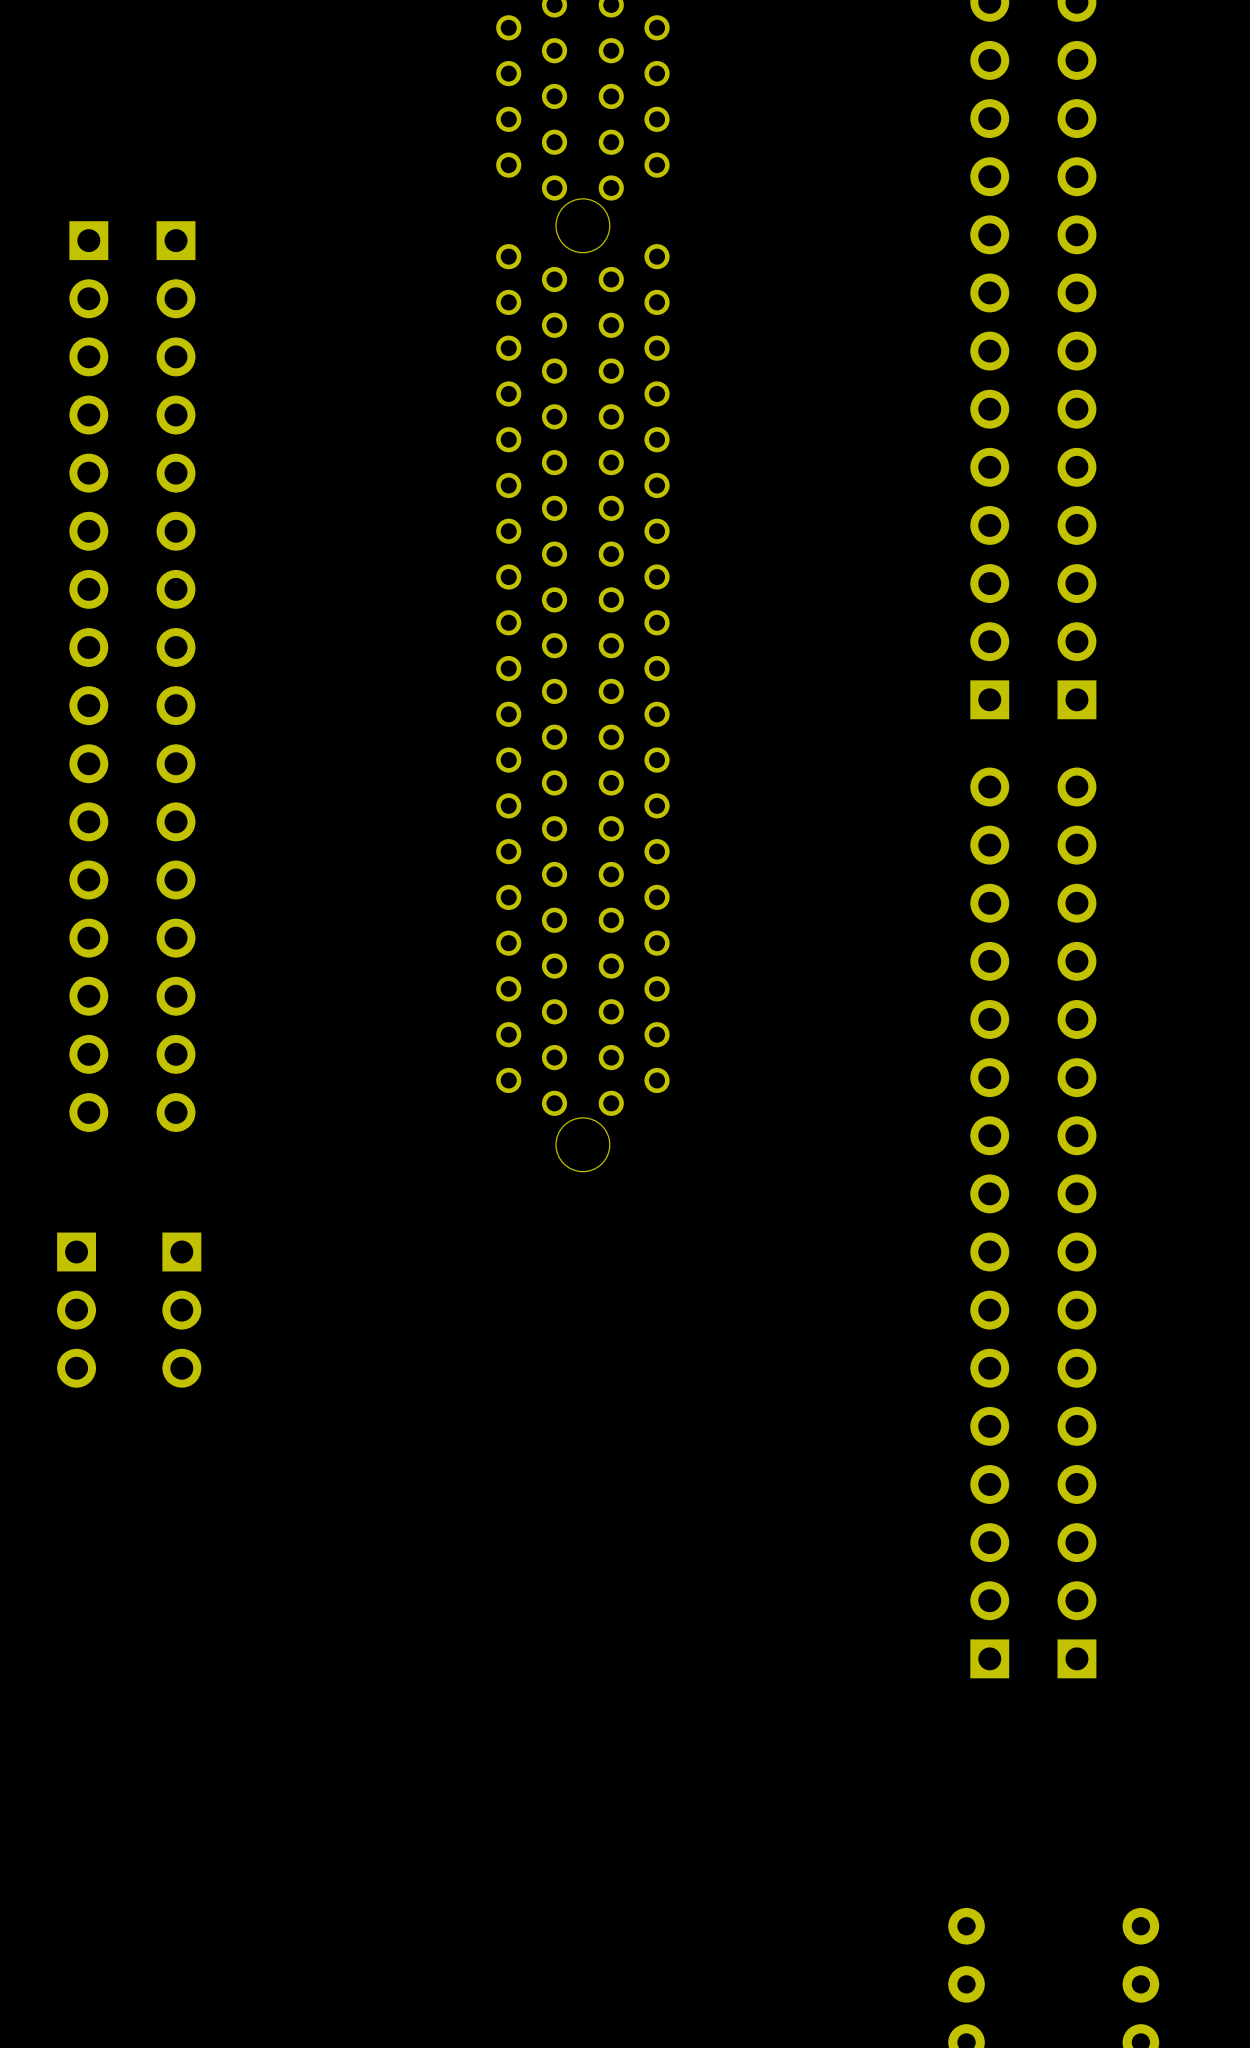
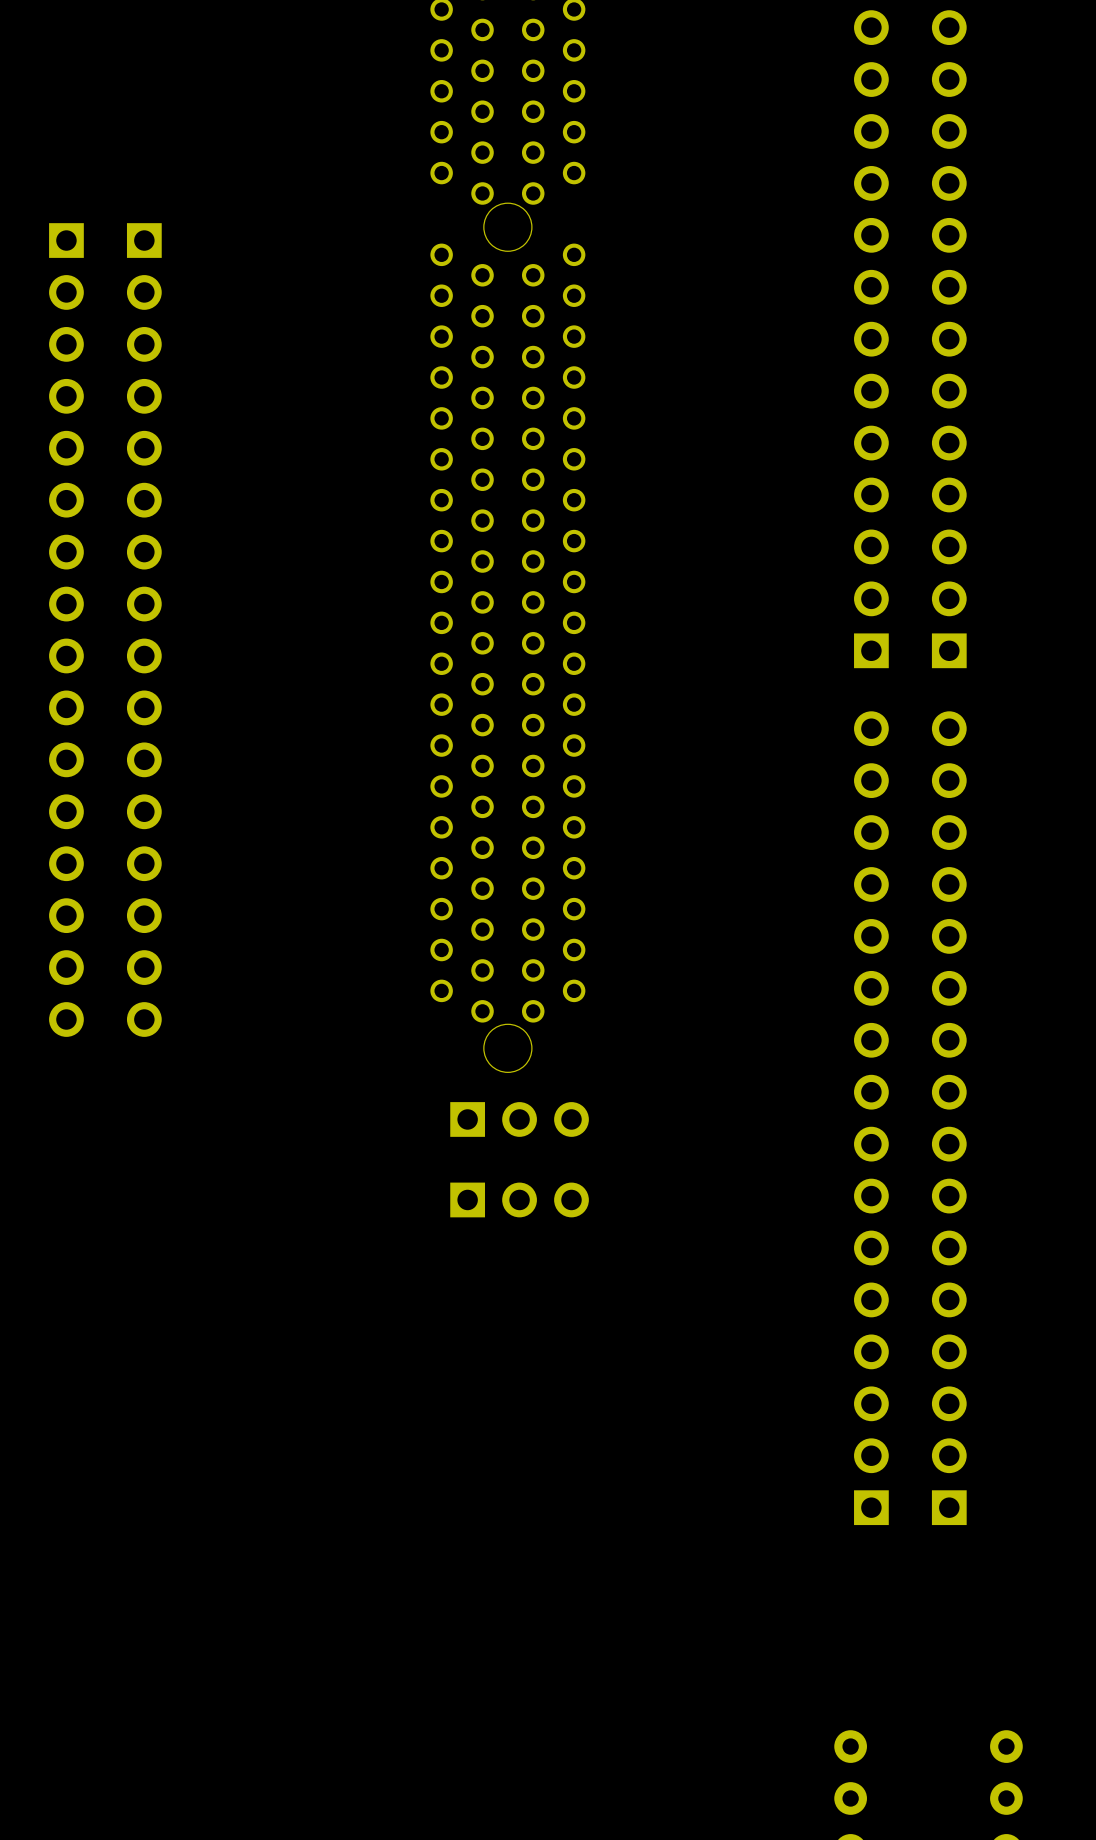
part: none -> (519, 1119)
part: (76, 1310) -> none
part: (181, 1310) -> none
part: none -> (519, 1199)

